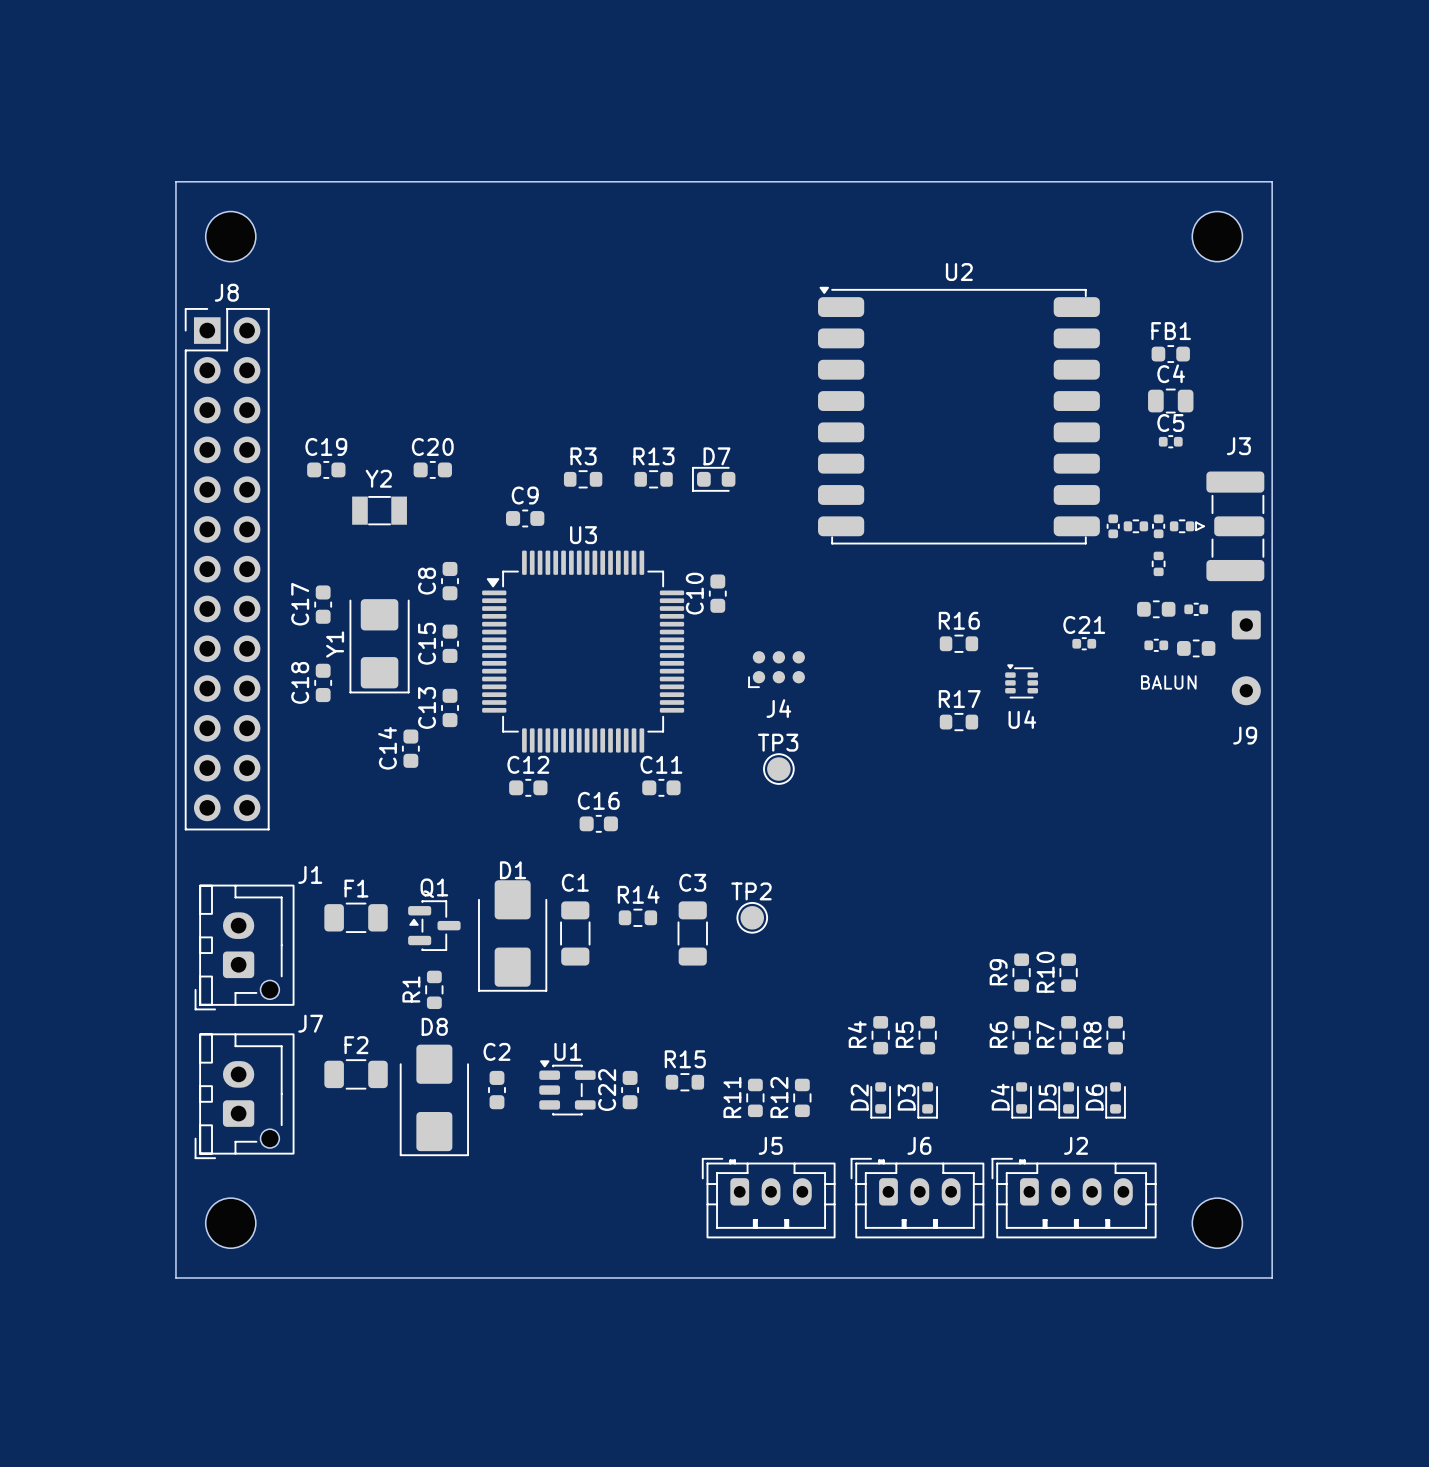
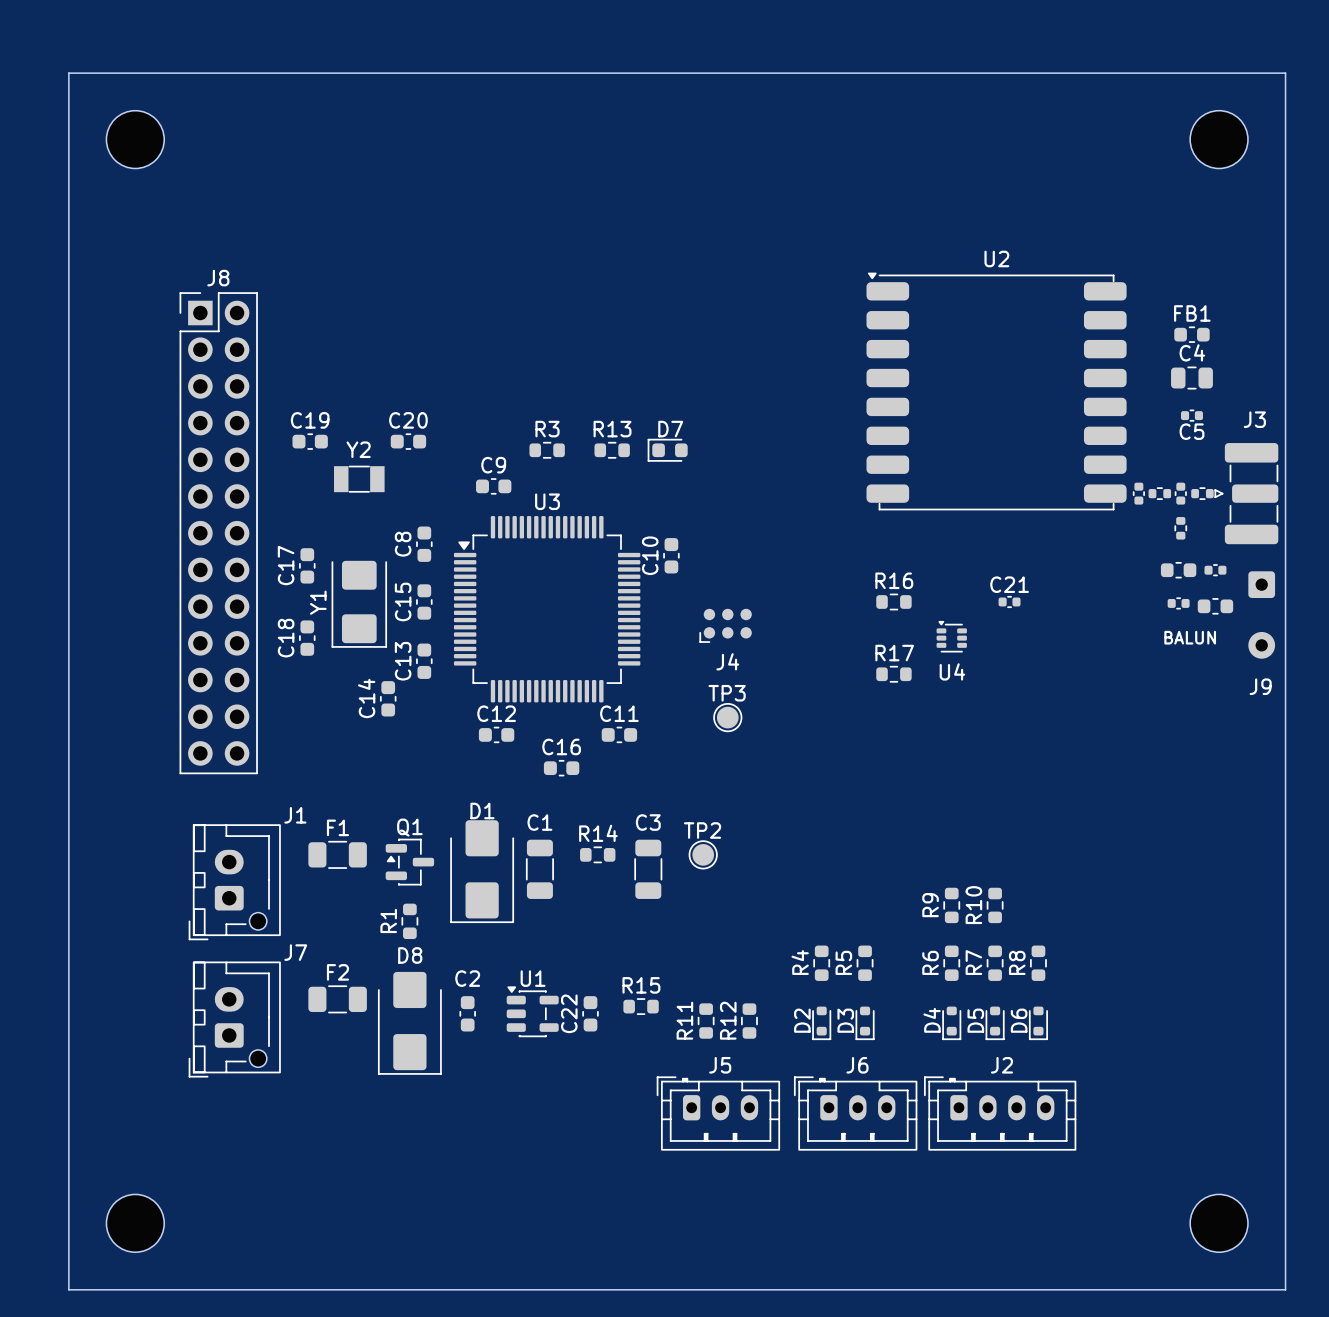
part: none -> (135, 139)
part: none -> (1219, 139)
board edge: (175, 181) (1272, 181) (1272, 1277) (175, 1277) (175, 181) -> (68, 73) (68, 1289) (1285, 1289) (1285, 73) (68, 73)
part: (230, 236) -> none
part: (1217, 236) -> none
FB1 position: (1170, 354) -> (1191, 334)
C4 position: (1170, 401) -> (1191, 378)
U2 position: (958, 415) -> (996, 391)
C5 name position: C5 (1170, 423) -> C5 (1191, 431)
C5 position: (1170, 441) -> (1191, 415)
part: (1113, 526) -> none
part: (1135, 526) -> none
part: (1158, 526) -> none
part: (1182, 526) -> none
part: none -> (1138, 493)
J3 position: (1229, 526) -> (1246, 493)
part: none -> (1159, 493)
part: none -> (1180, 493)
part: none -> (1202, 493)
part: (1158, 563) -> none
part: none -> (1180, 528)
part: (1156, 609) -> none
part: (1196, 609) -> none
part: none -> (1178, 570)
part: none -> (1215, 570)
part: (1156, 645) -> none
part: none -> (1178, 603)
part: (1196, 648) -> none
part: none -> (1215, 606)
J9 position: (1246, 657) -> (1261, 615)
text position: BALUN (1168, 682) -> BALUN (1190, 637)
part: (230, 1223) -> none
part: (1217, 1223) -> none
part: none -> (135, 1223)
part: none -> (1219, 1223)

